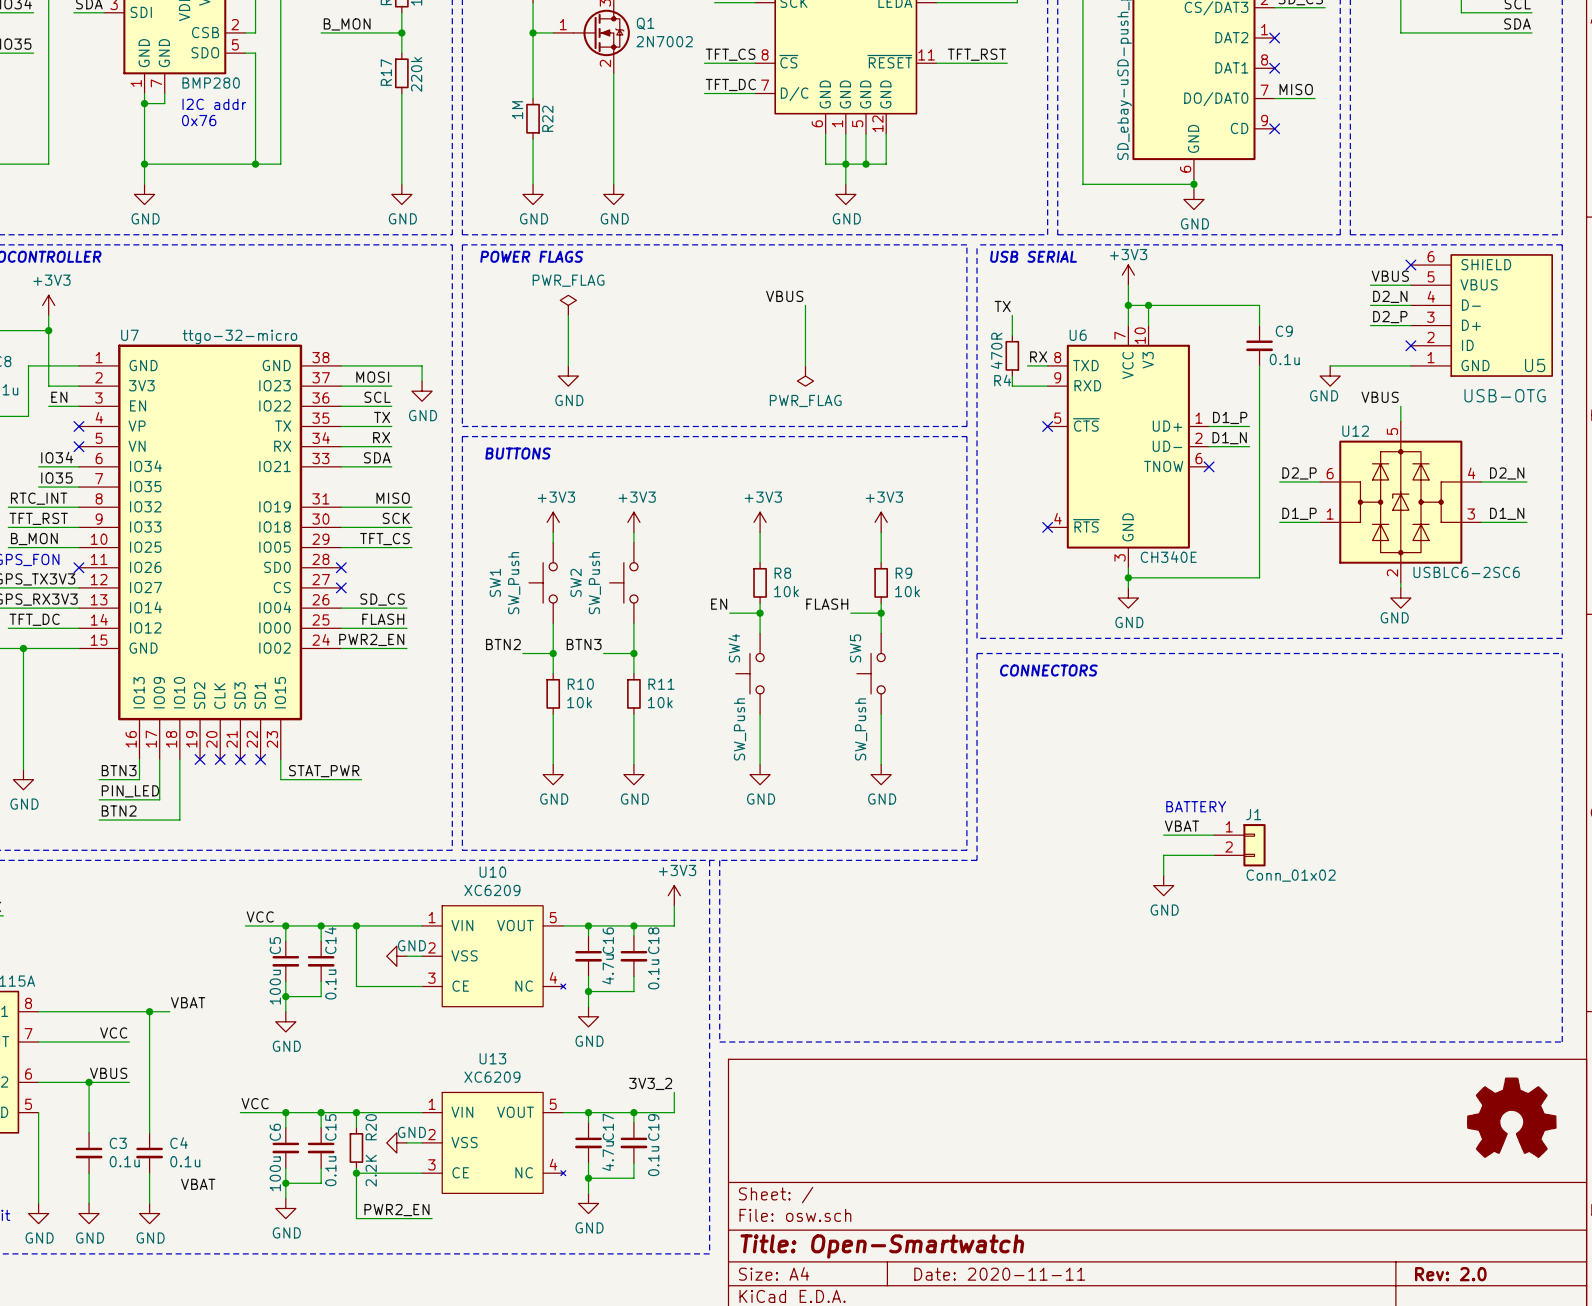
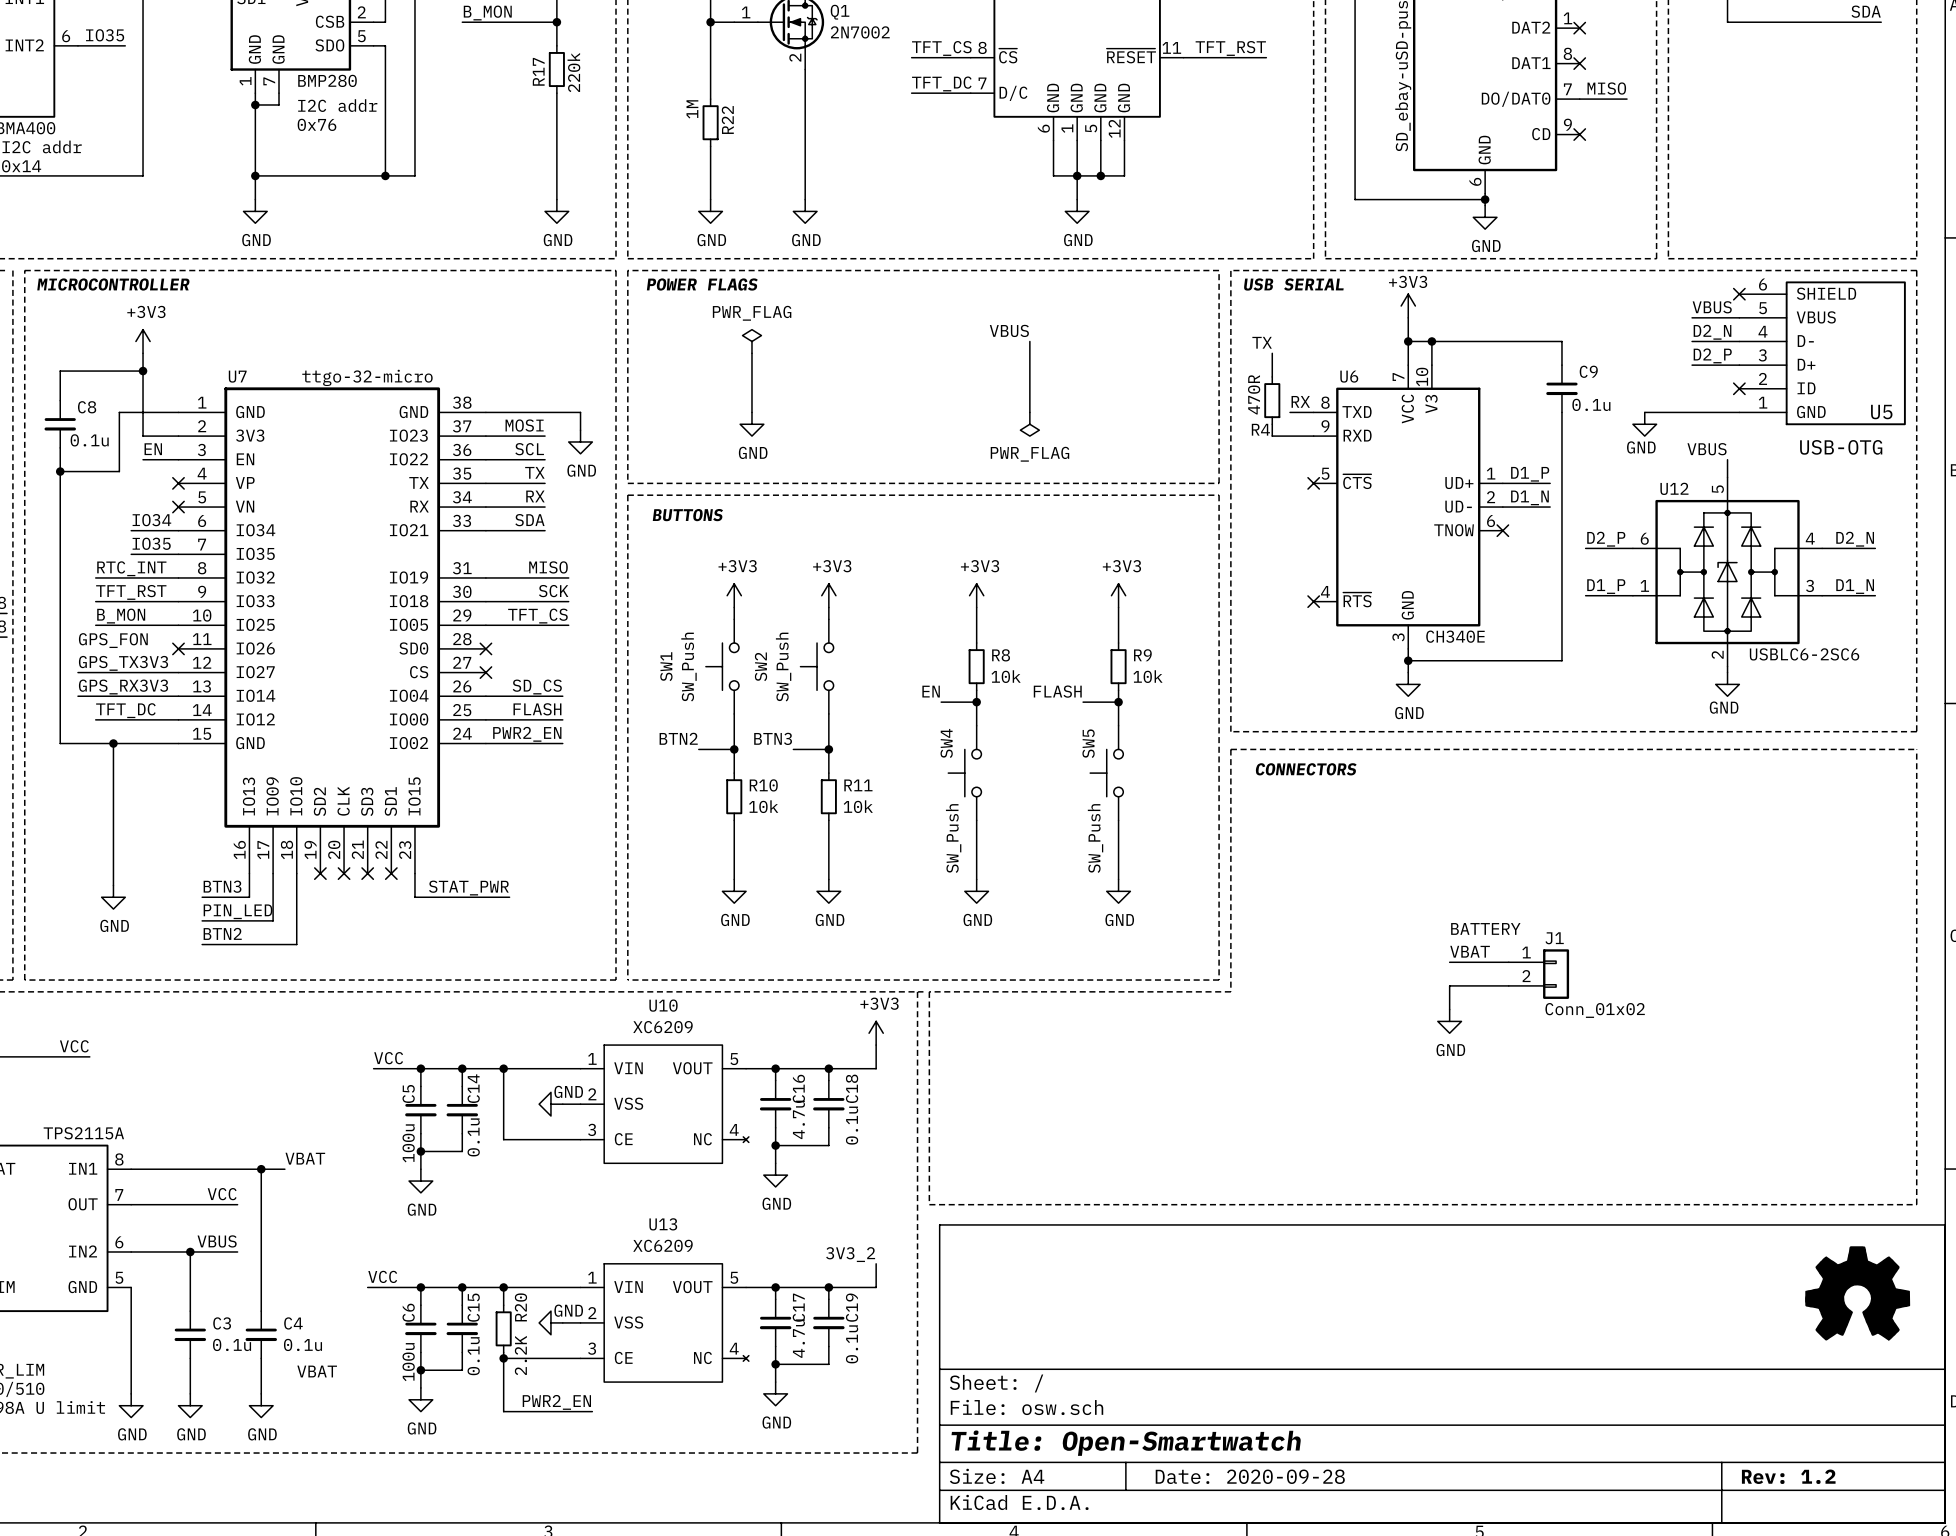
title block: Date: 2020-11-11 (999, 1274) -> Date: 2020-09-28 (1250, 1476)
title block: Rev: 2.0 (1450, 1274) -> Rev: 1.2 (1788, 1476)

